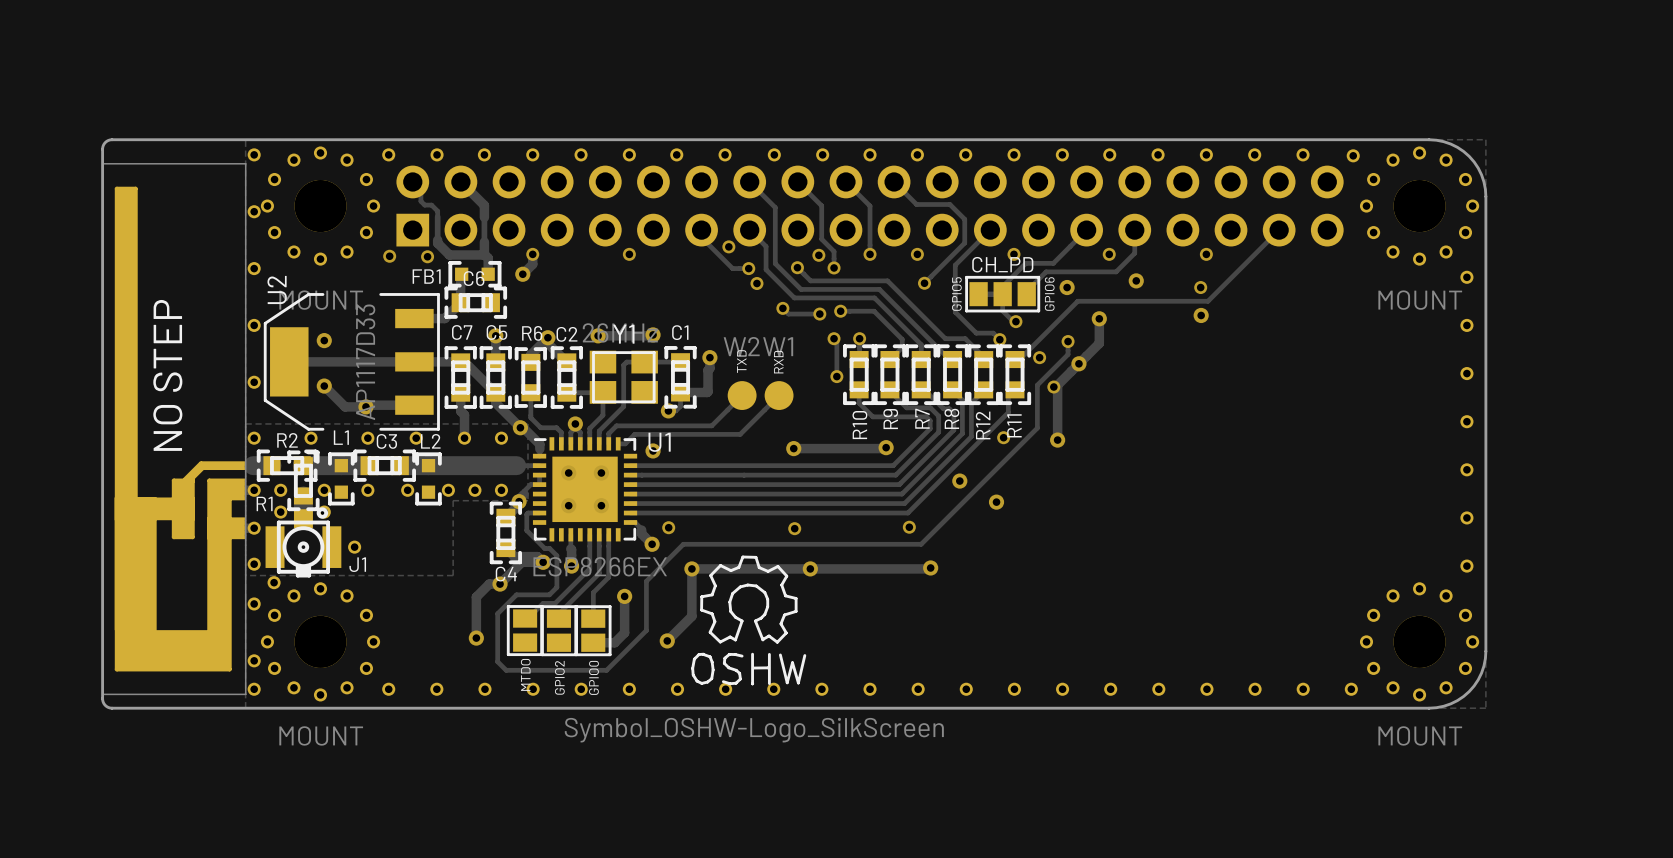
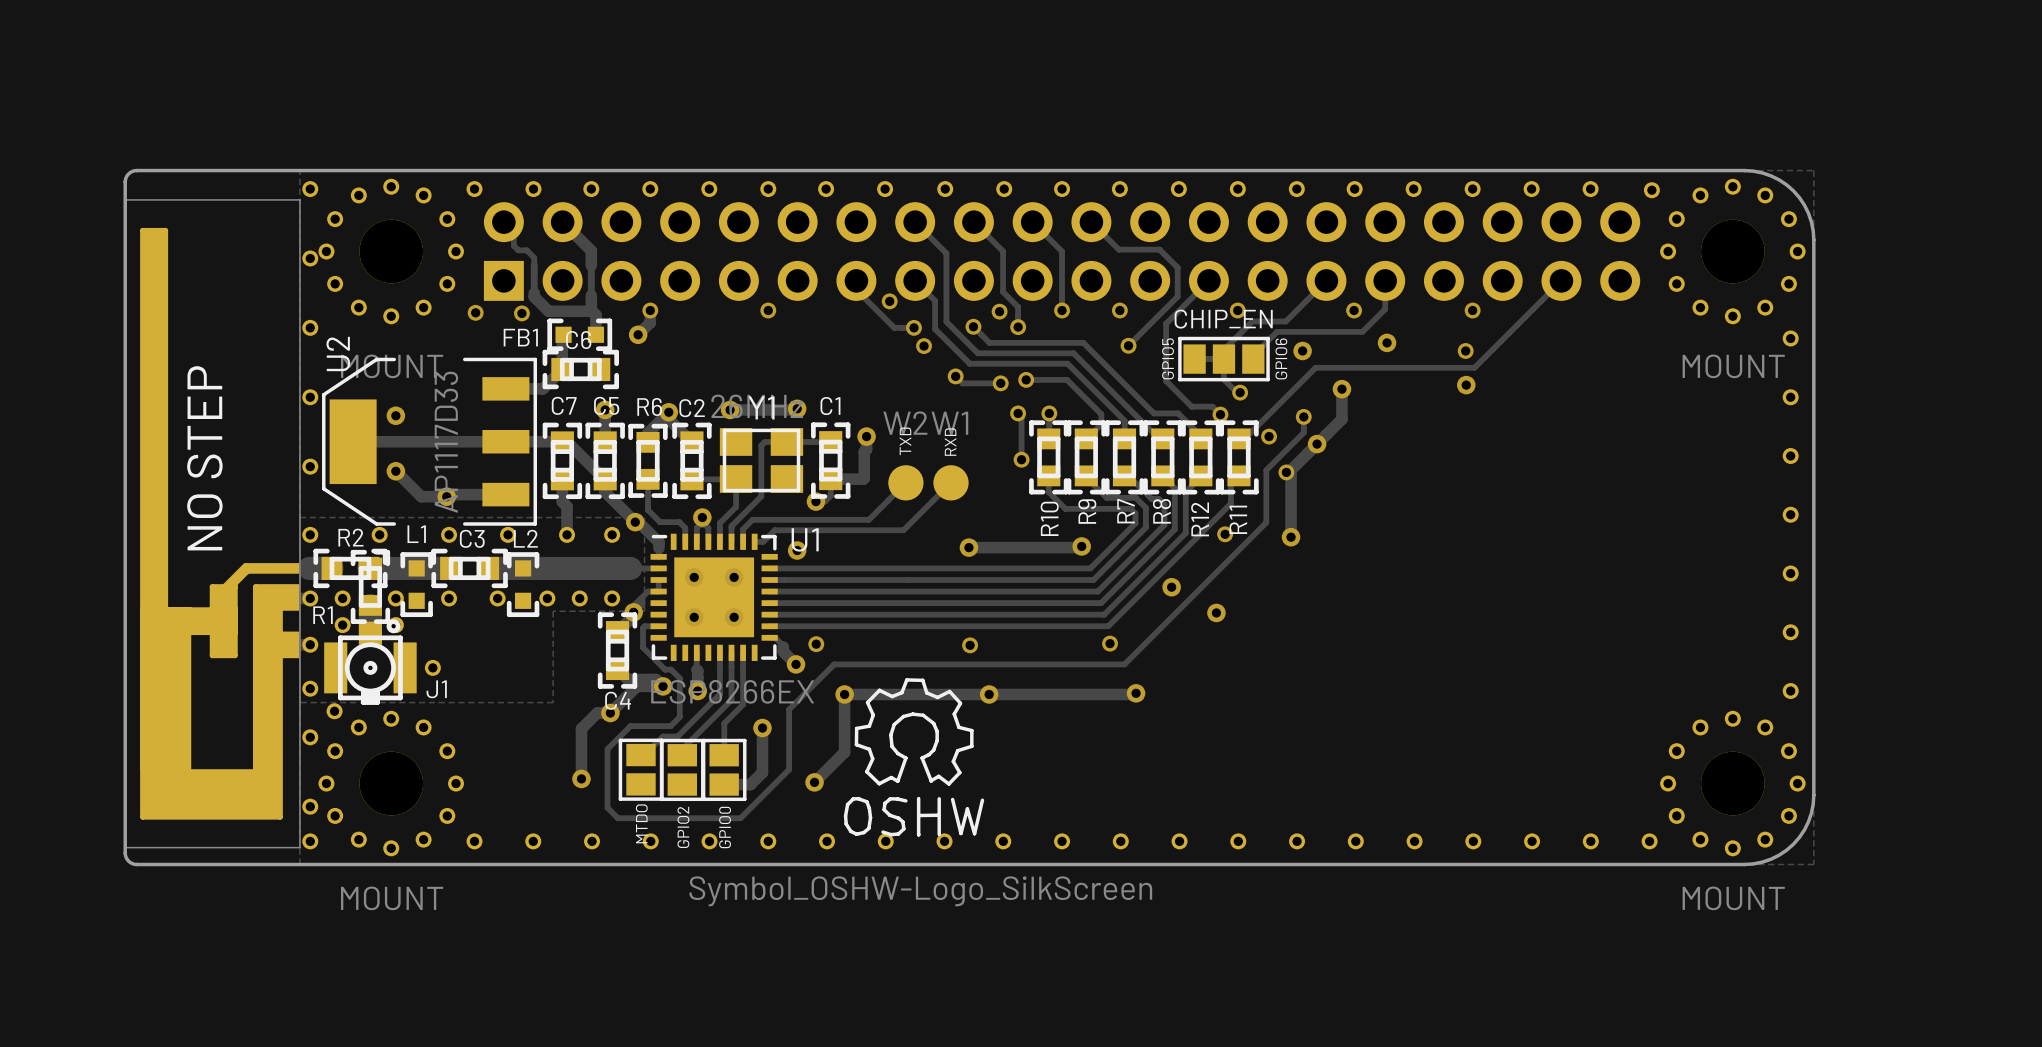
part value: CH_PD (1002, 264) -> CHIP_EN (1223, 319)

